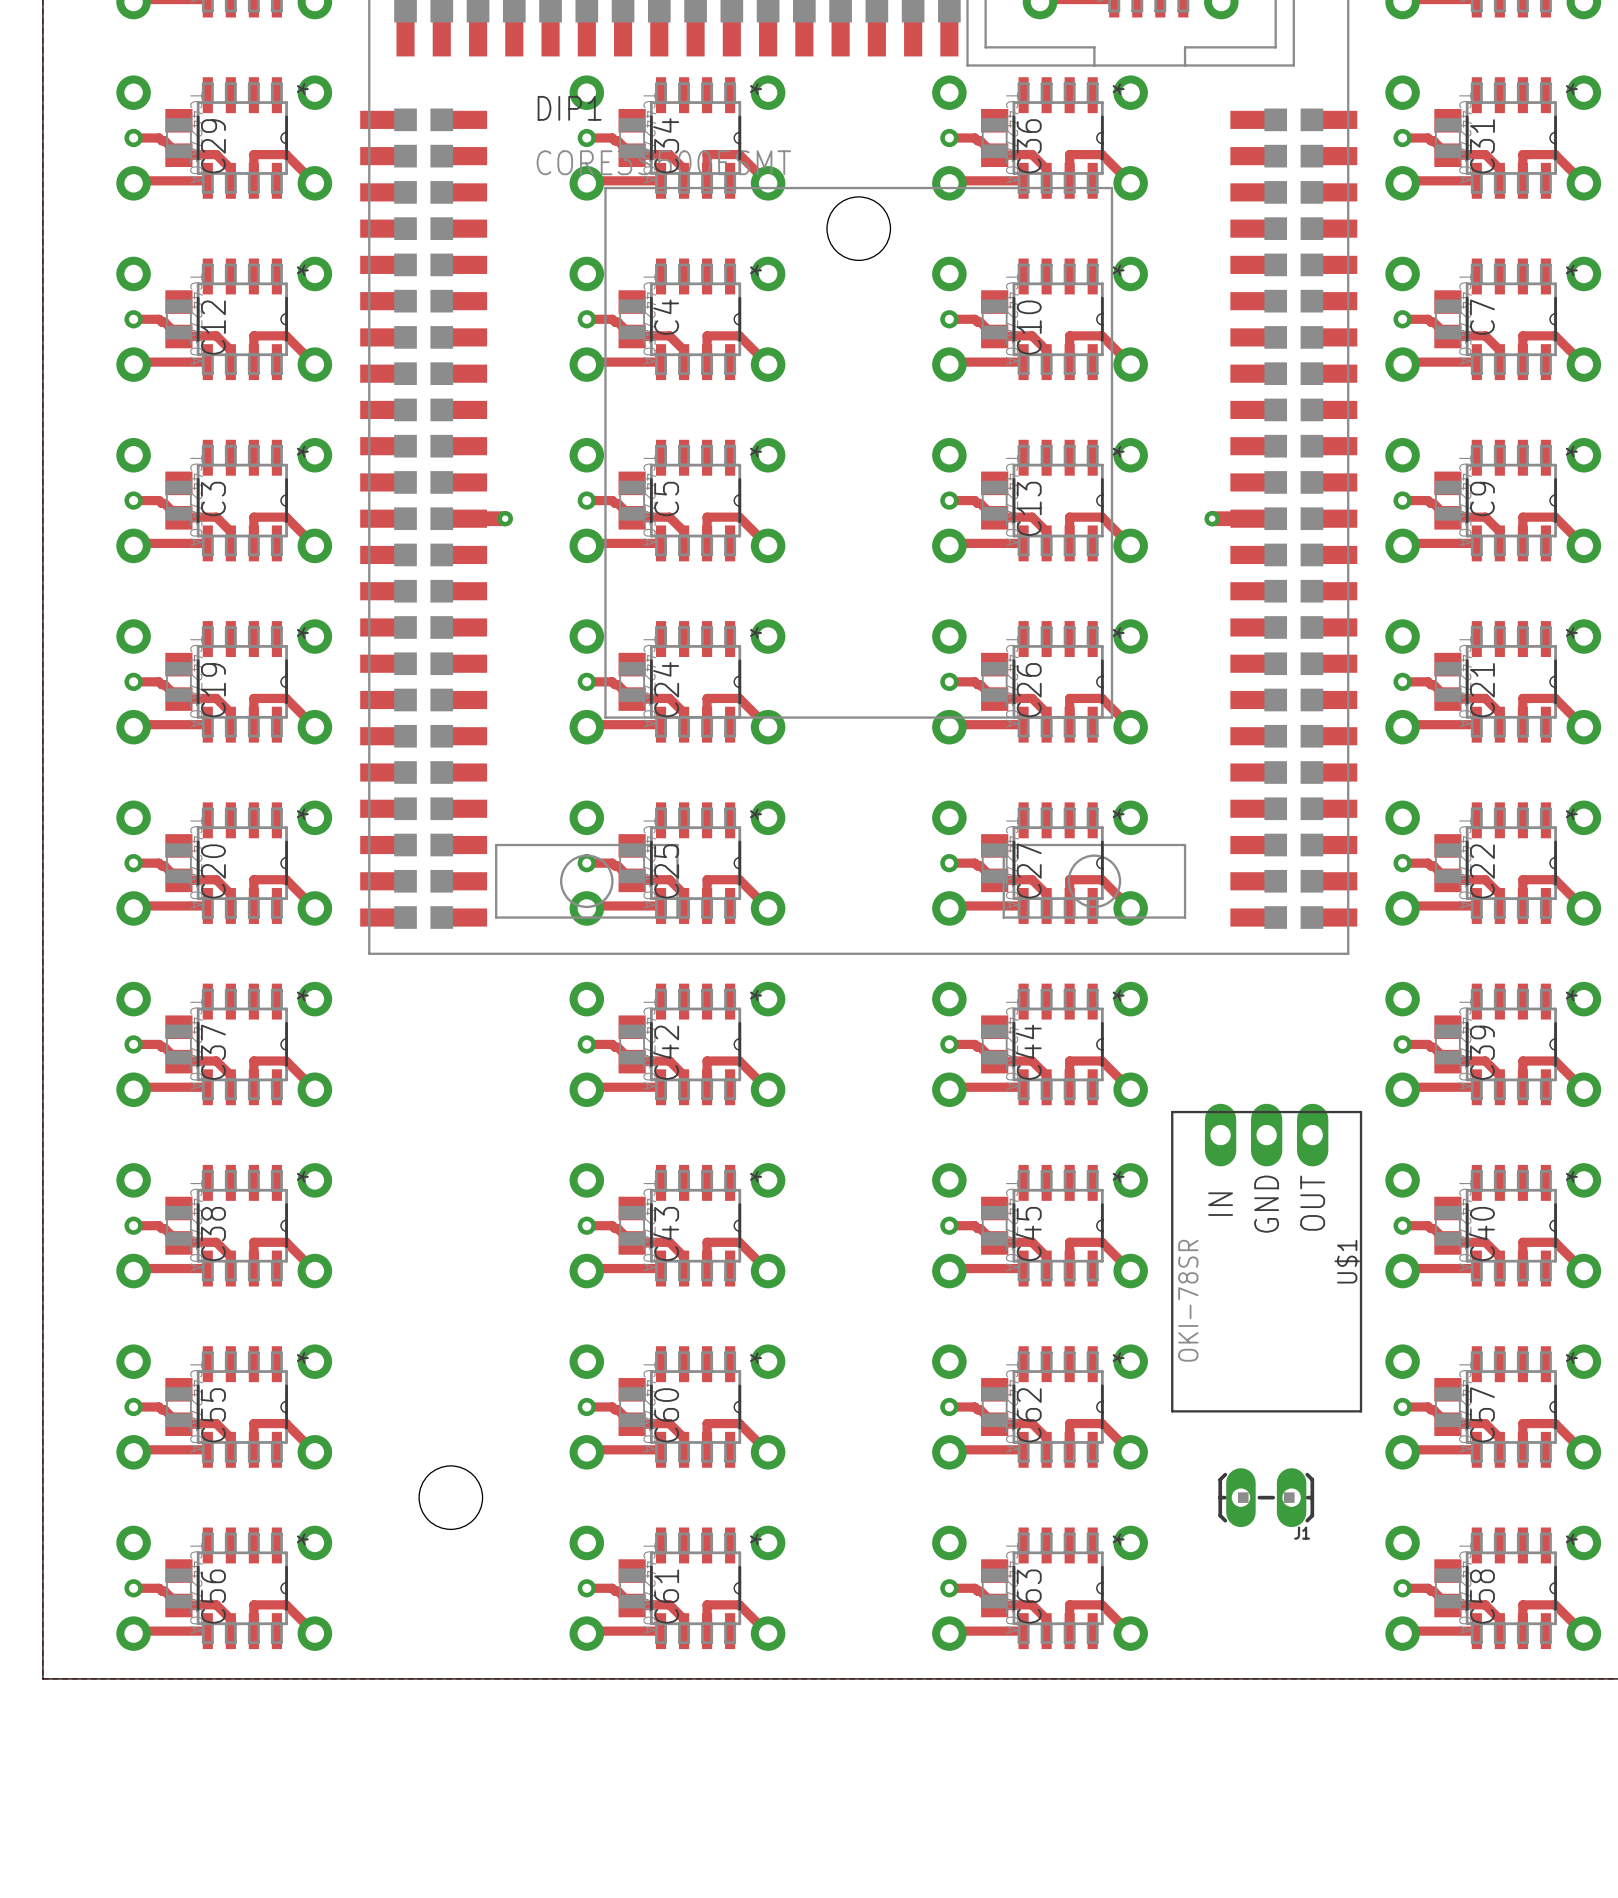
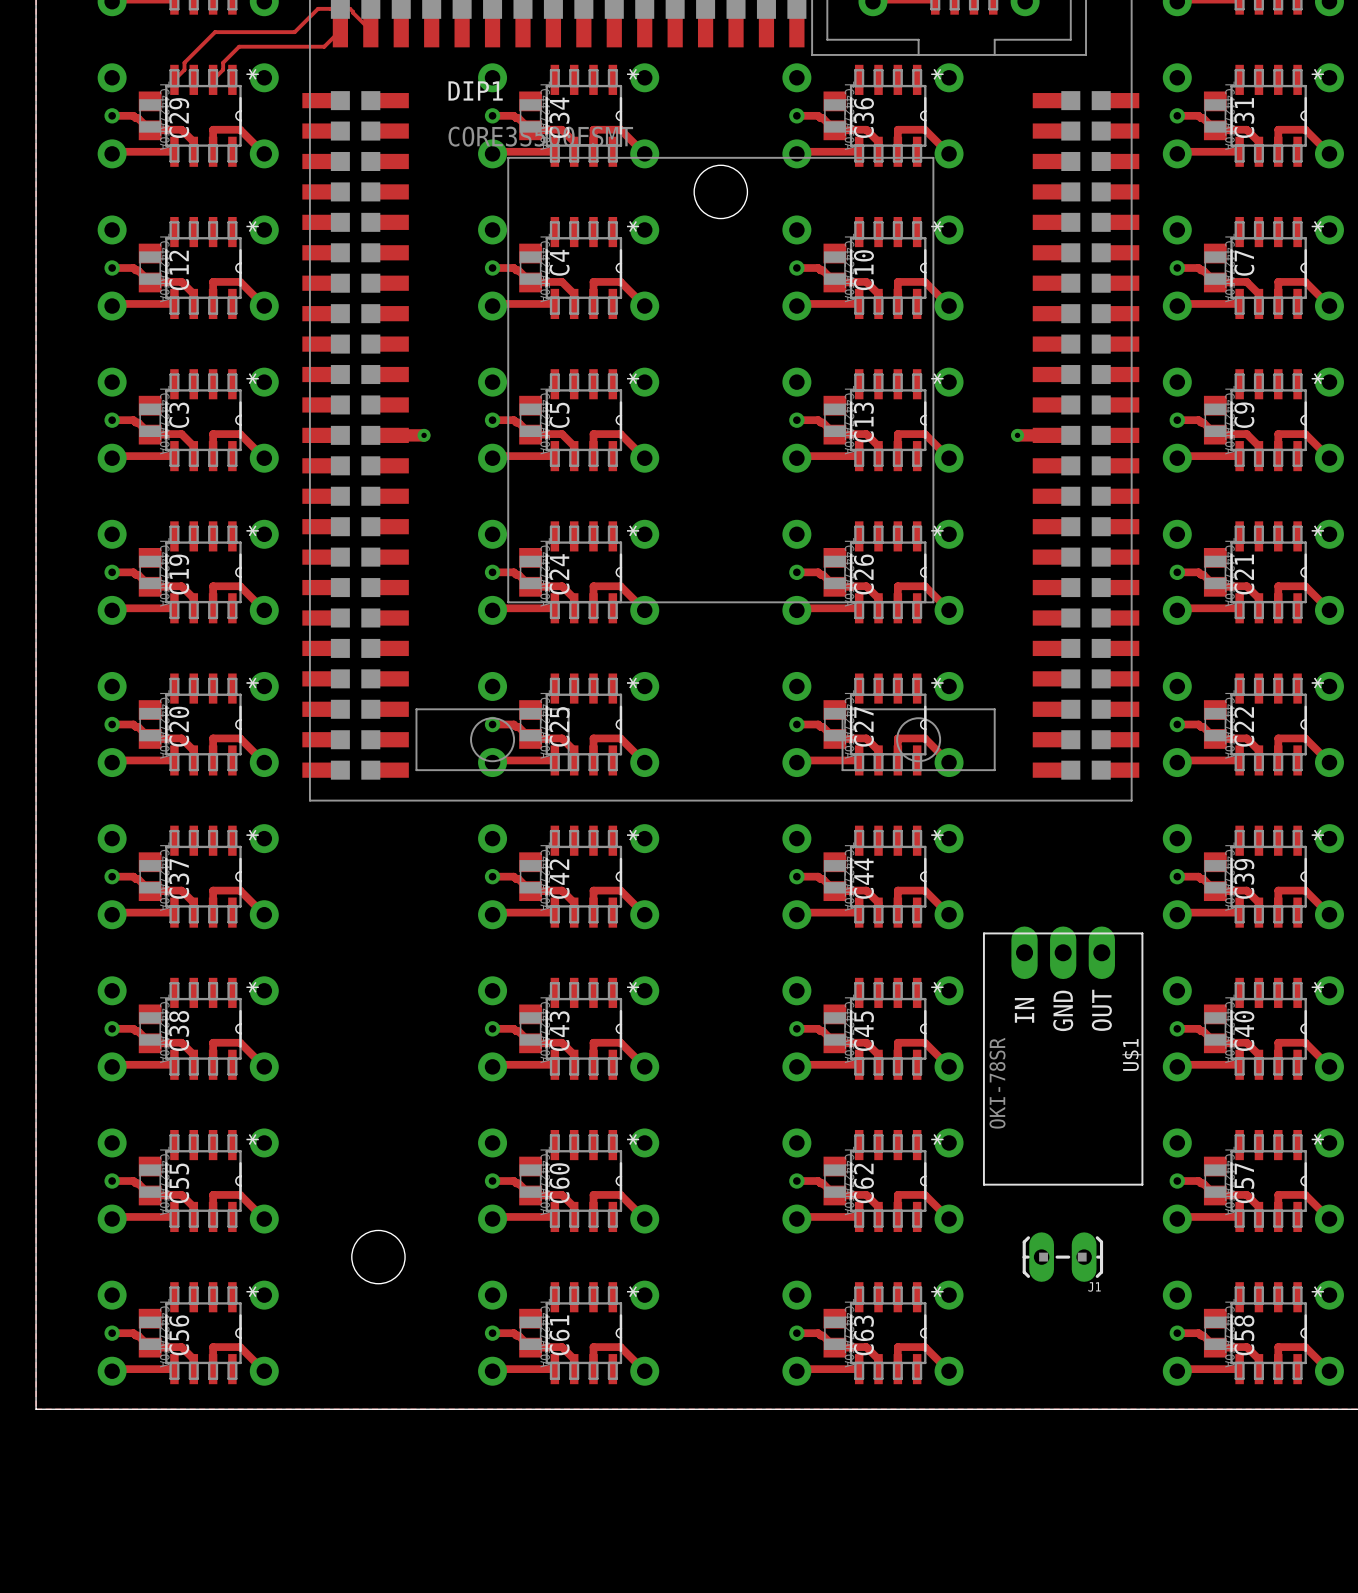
track: none -> (340, 30) (324, 46) (239, 46) (223, 62) (223, 69) (213, 79)
track: none -> (370, 30) (350, 8) (318, 8) (294, 32) (215, 32) (184, 62) (184, 69) (174, 79)

